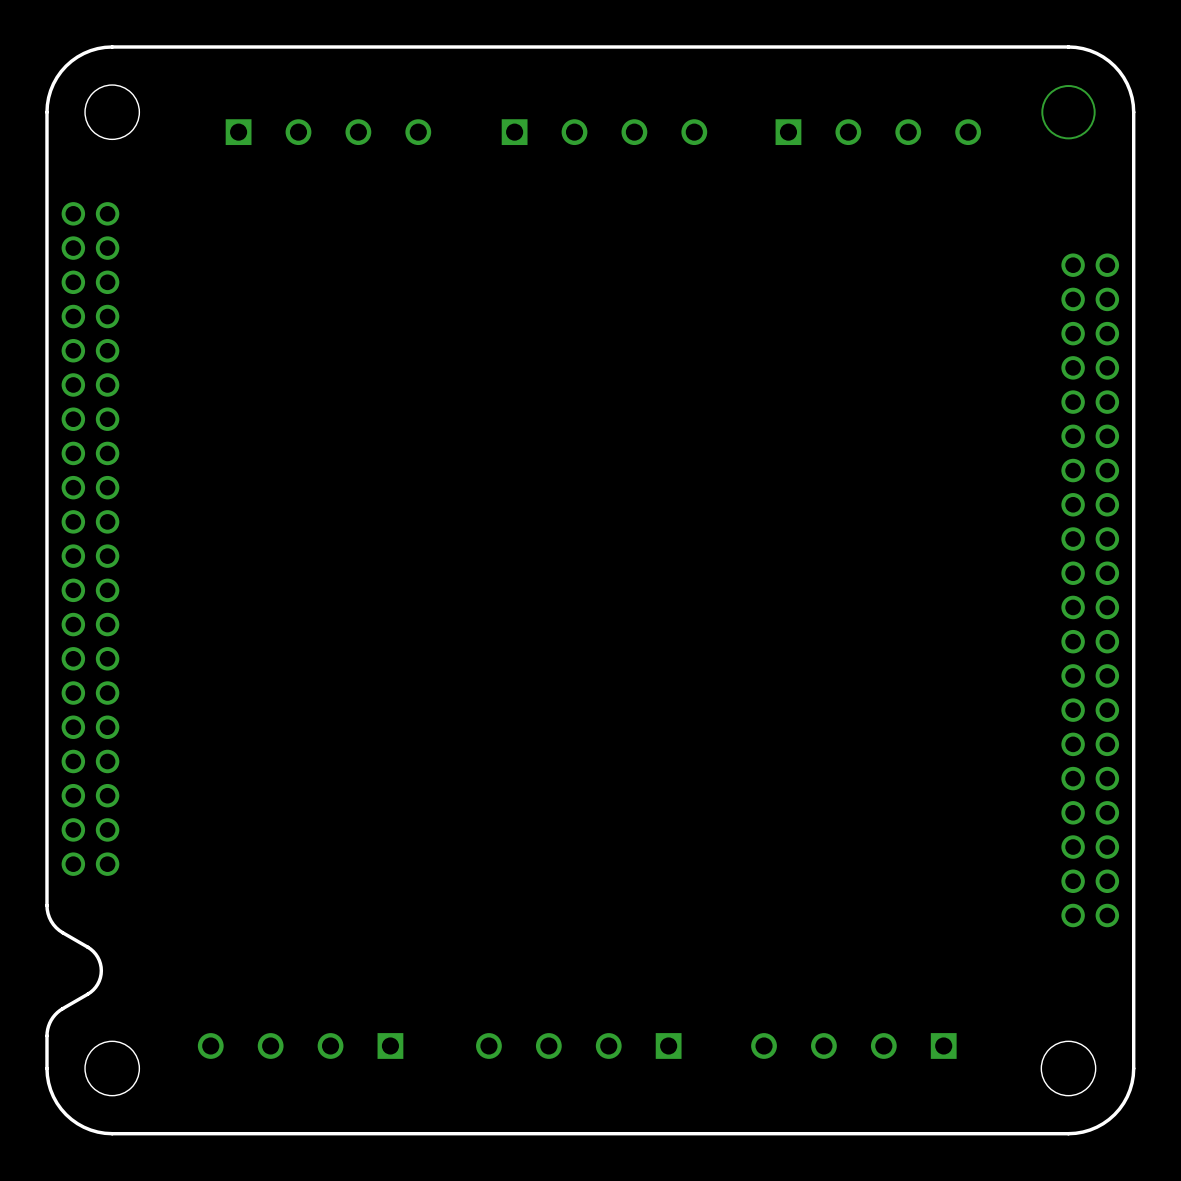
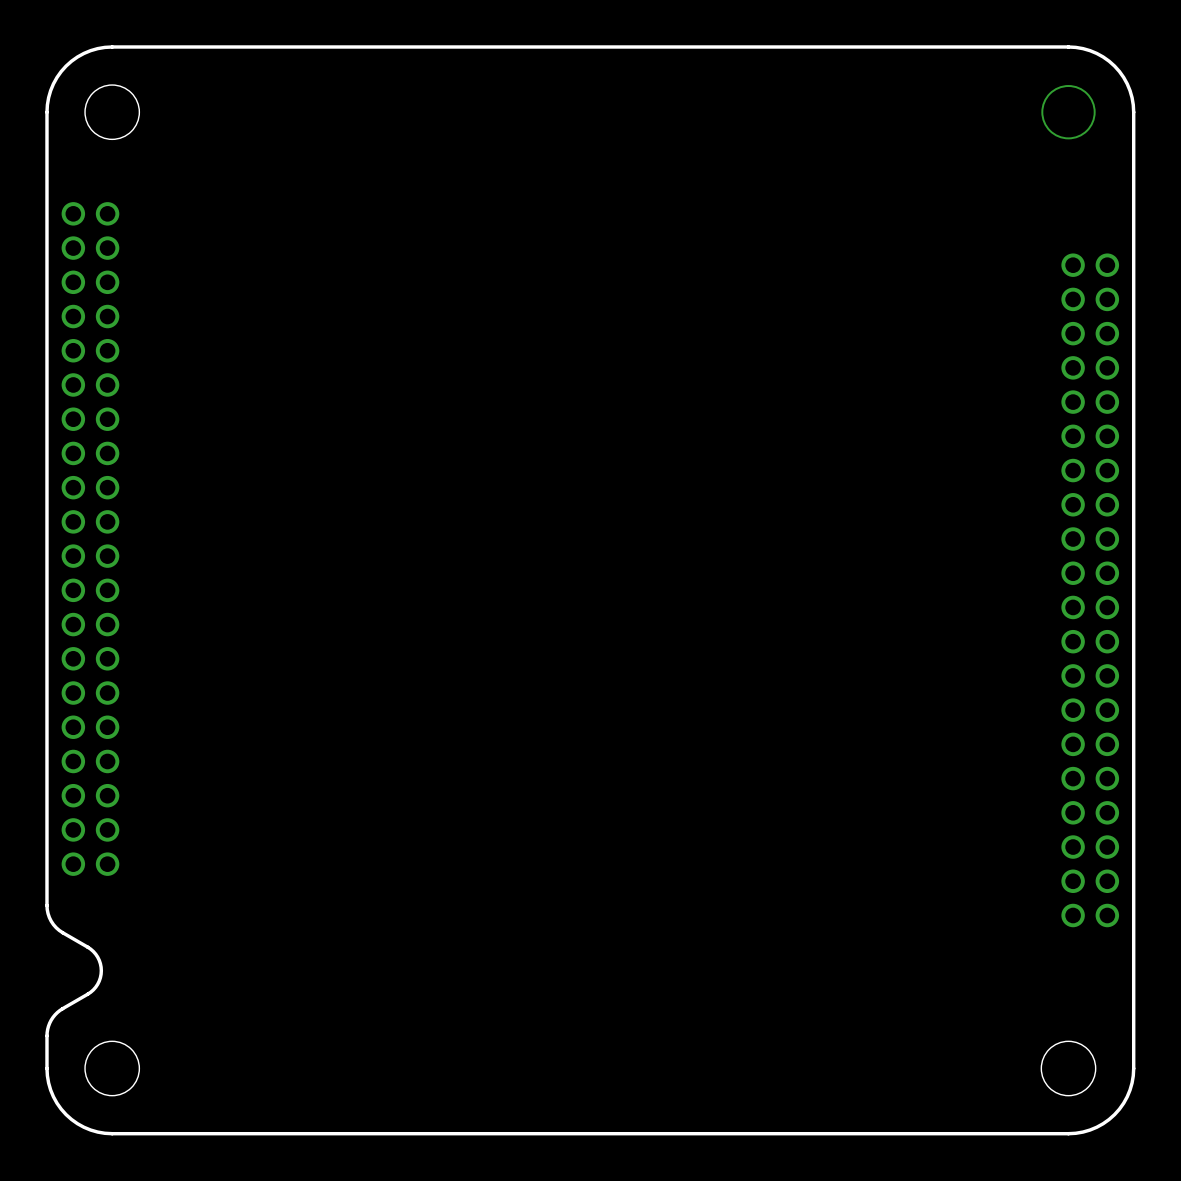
part: (328, 132) -> none
part: (604, 132) -> none
part: (878, 132) -> none
part: (300, 1045) -> none
part: (578, 1045) -> none
part: (853, 1045) -> none

